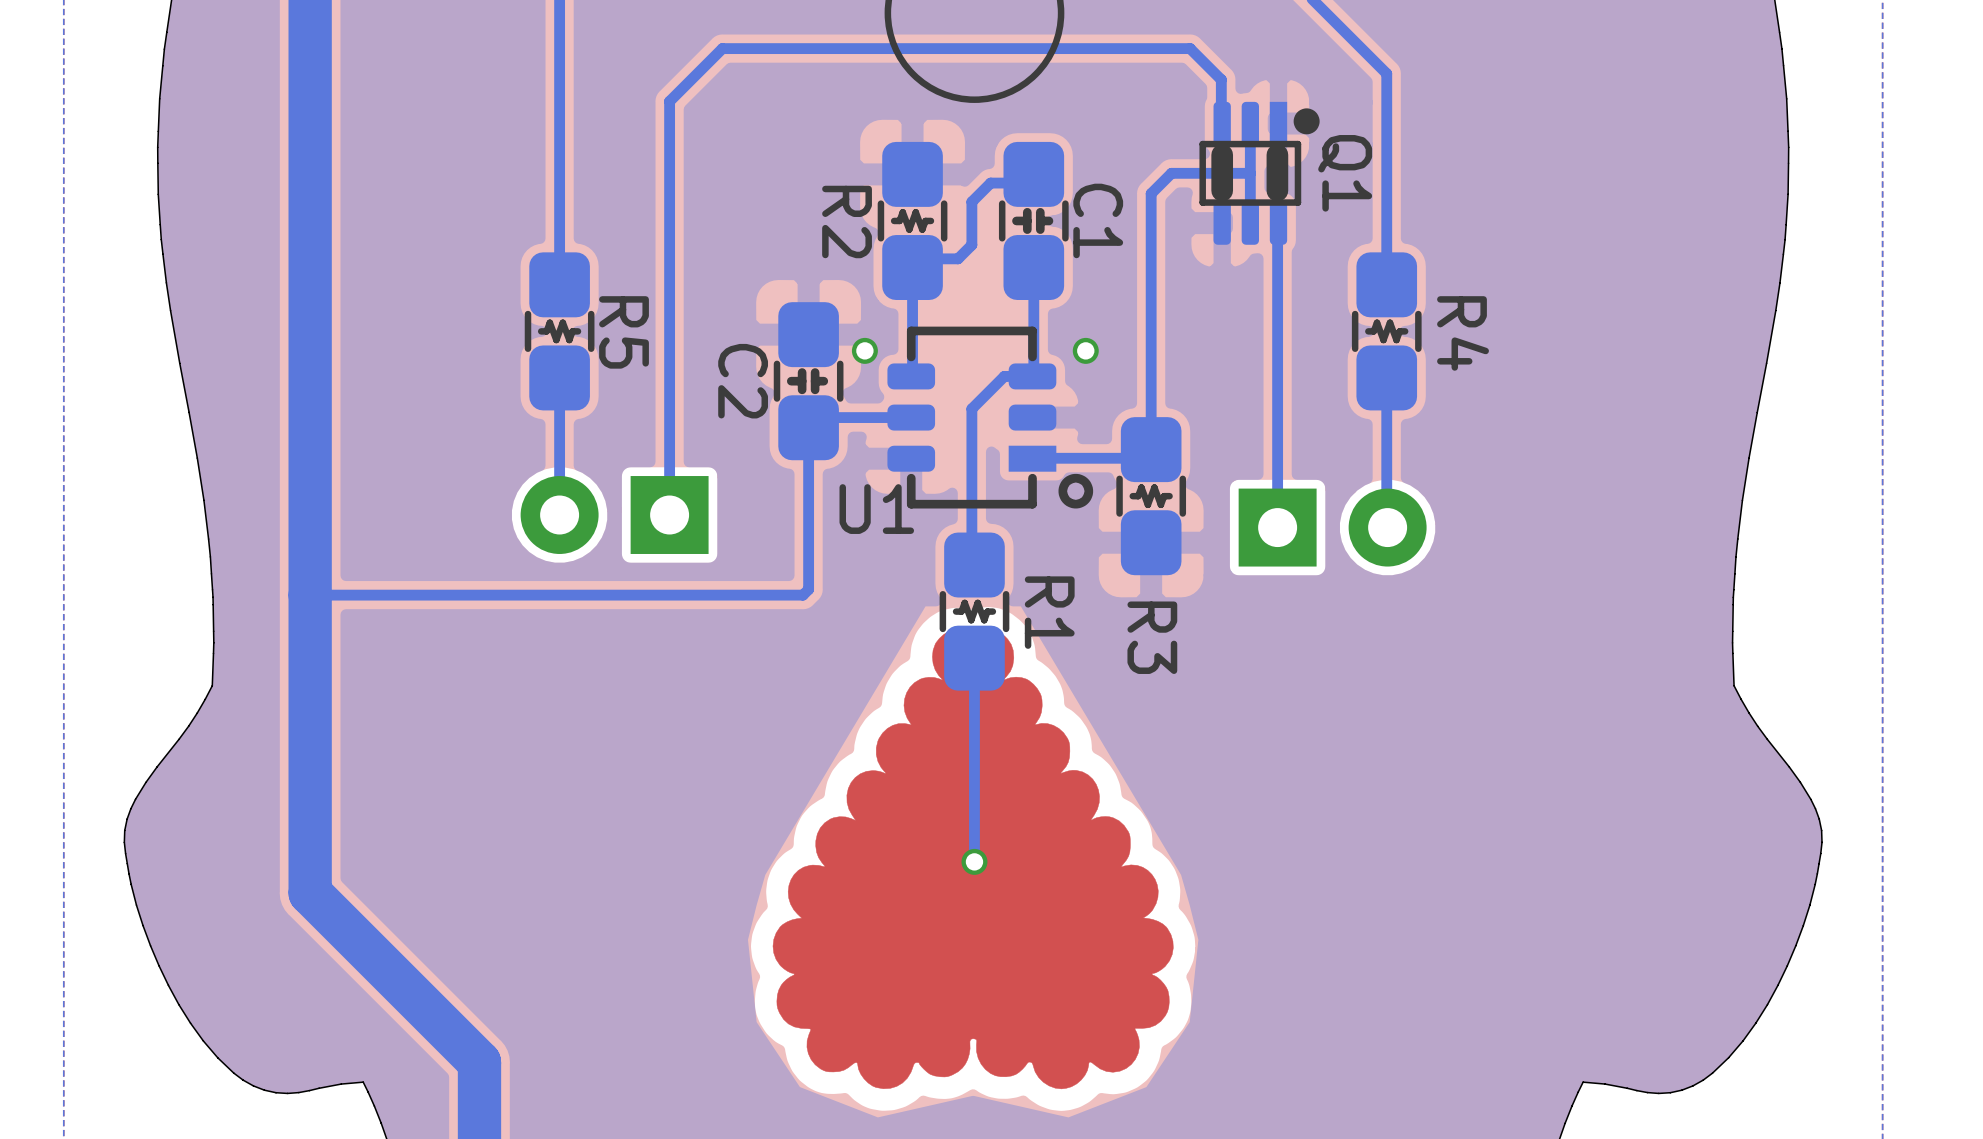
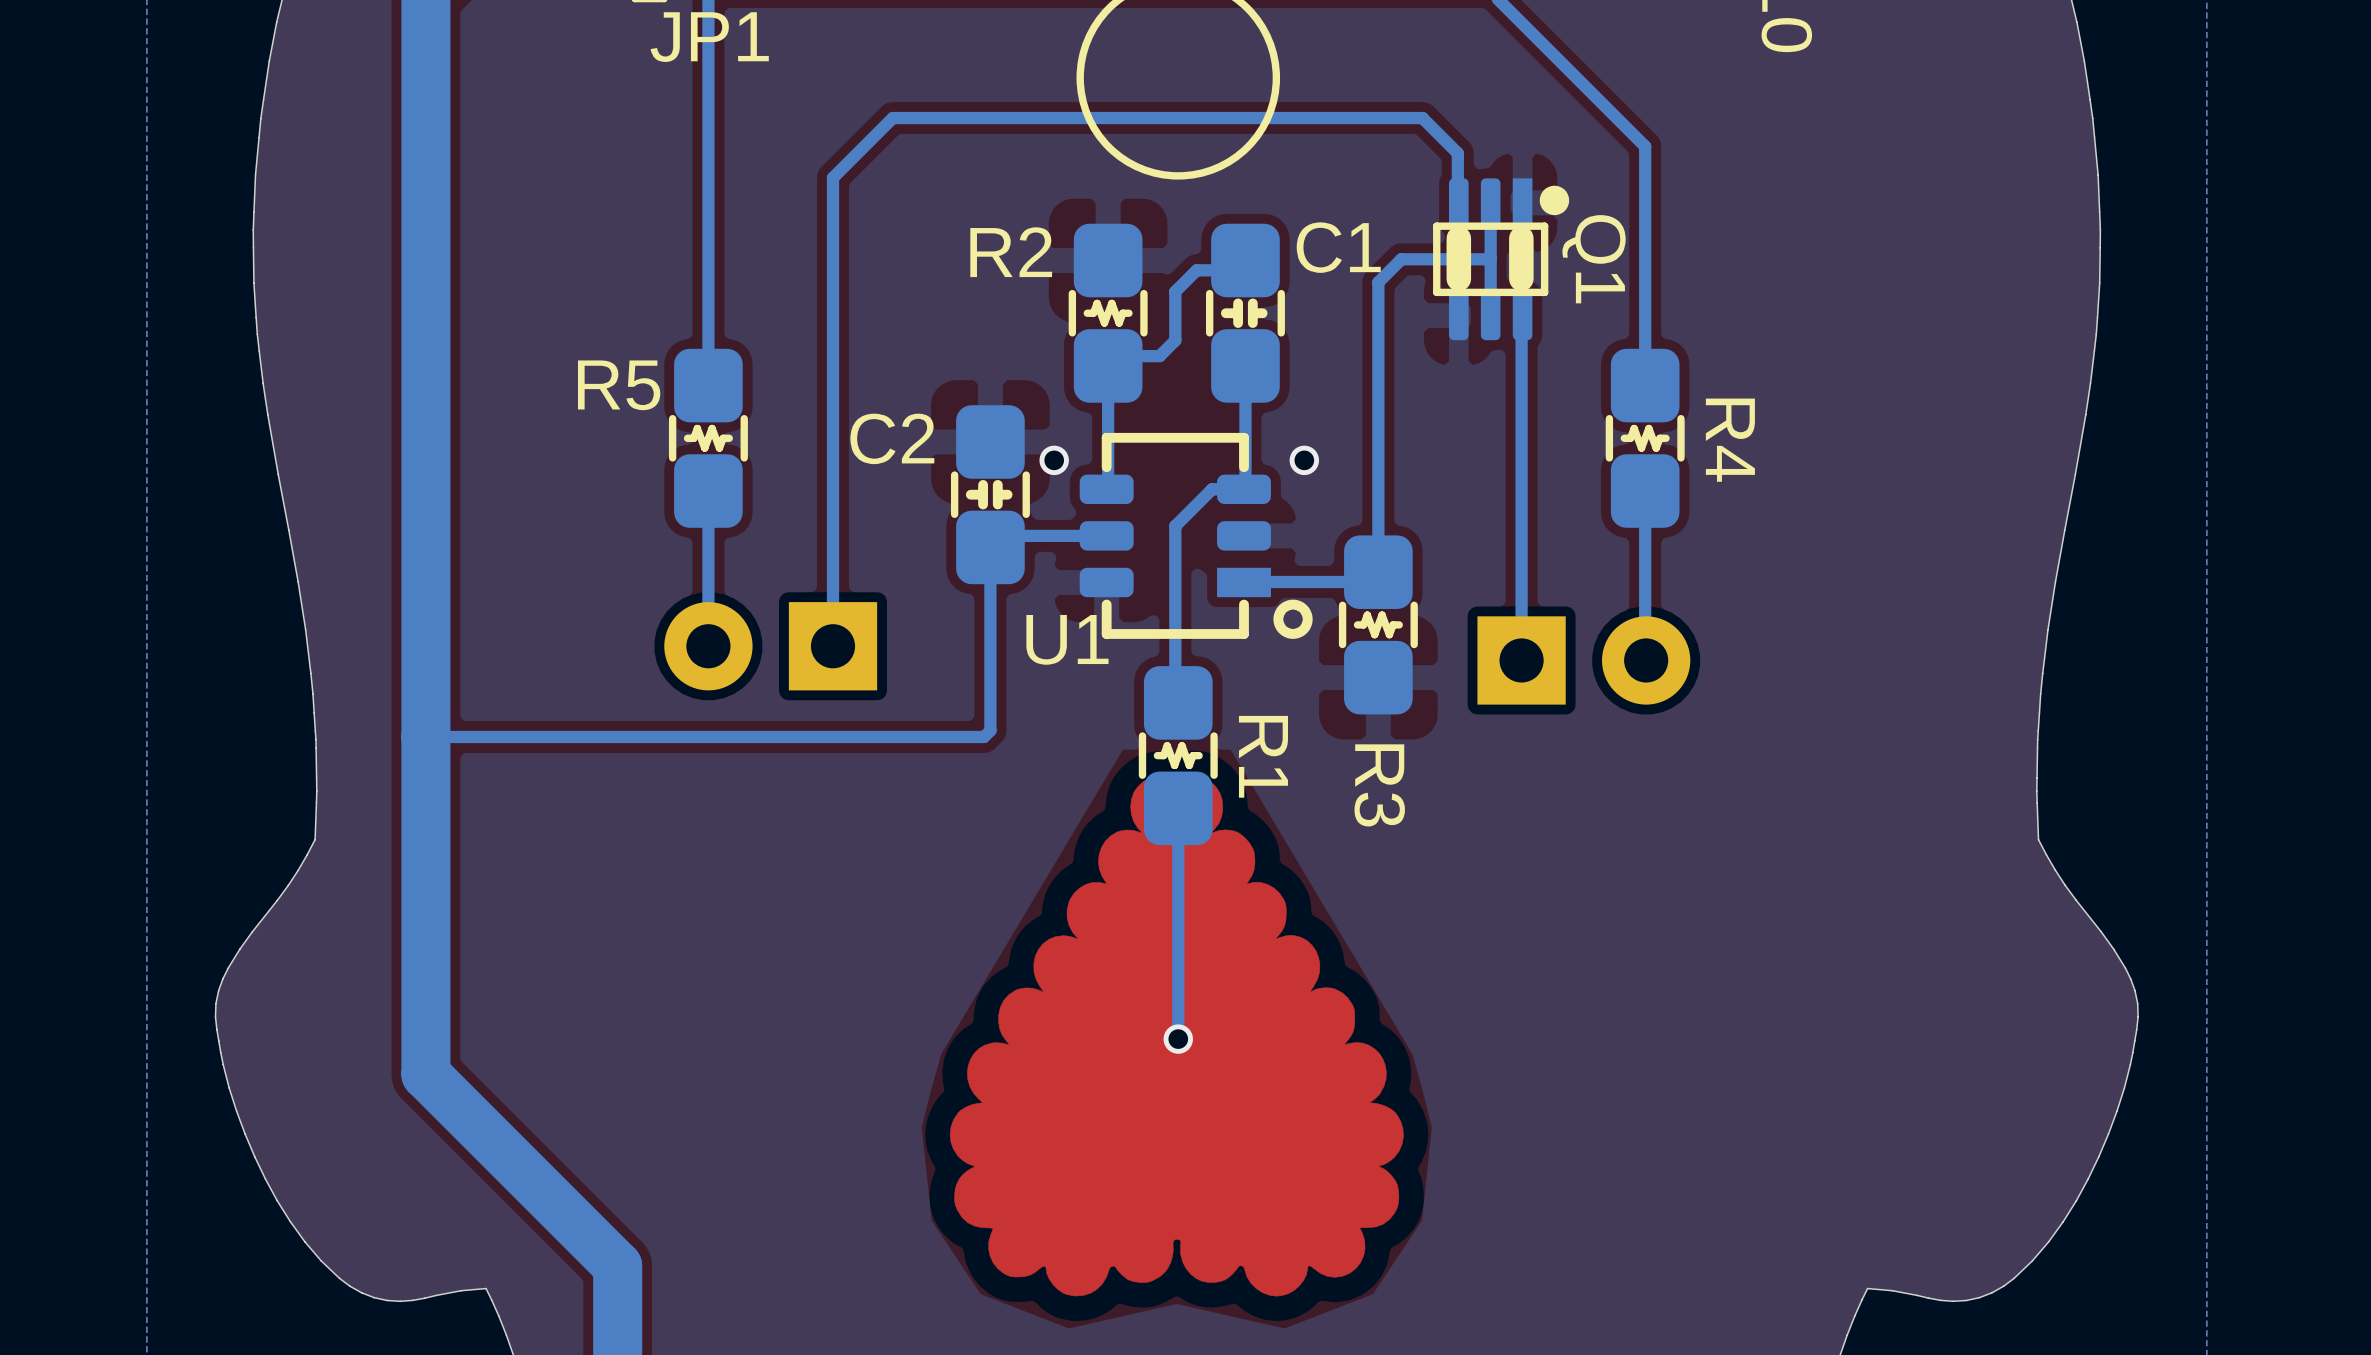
C1 name rotation: 0° (1098, 220) -> 90° counterclockwise (1338, 247)
R2 name rotation: 0° (847, 221) -> 90° counterclockwise (1011, 252)
R5 name rotation: 0° (624, 332) -> 90° counterclockwise (619, 385)
R5 name position: R5 (624, 332) -> R5 (619, 385)
C2 name rotation: 0° (743, 381) -> 90° counterclockwise (892, 438)

